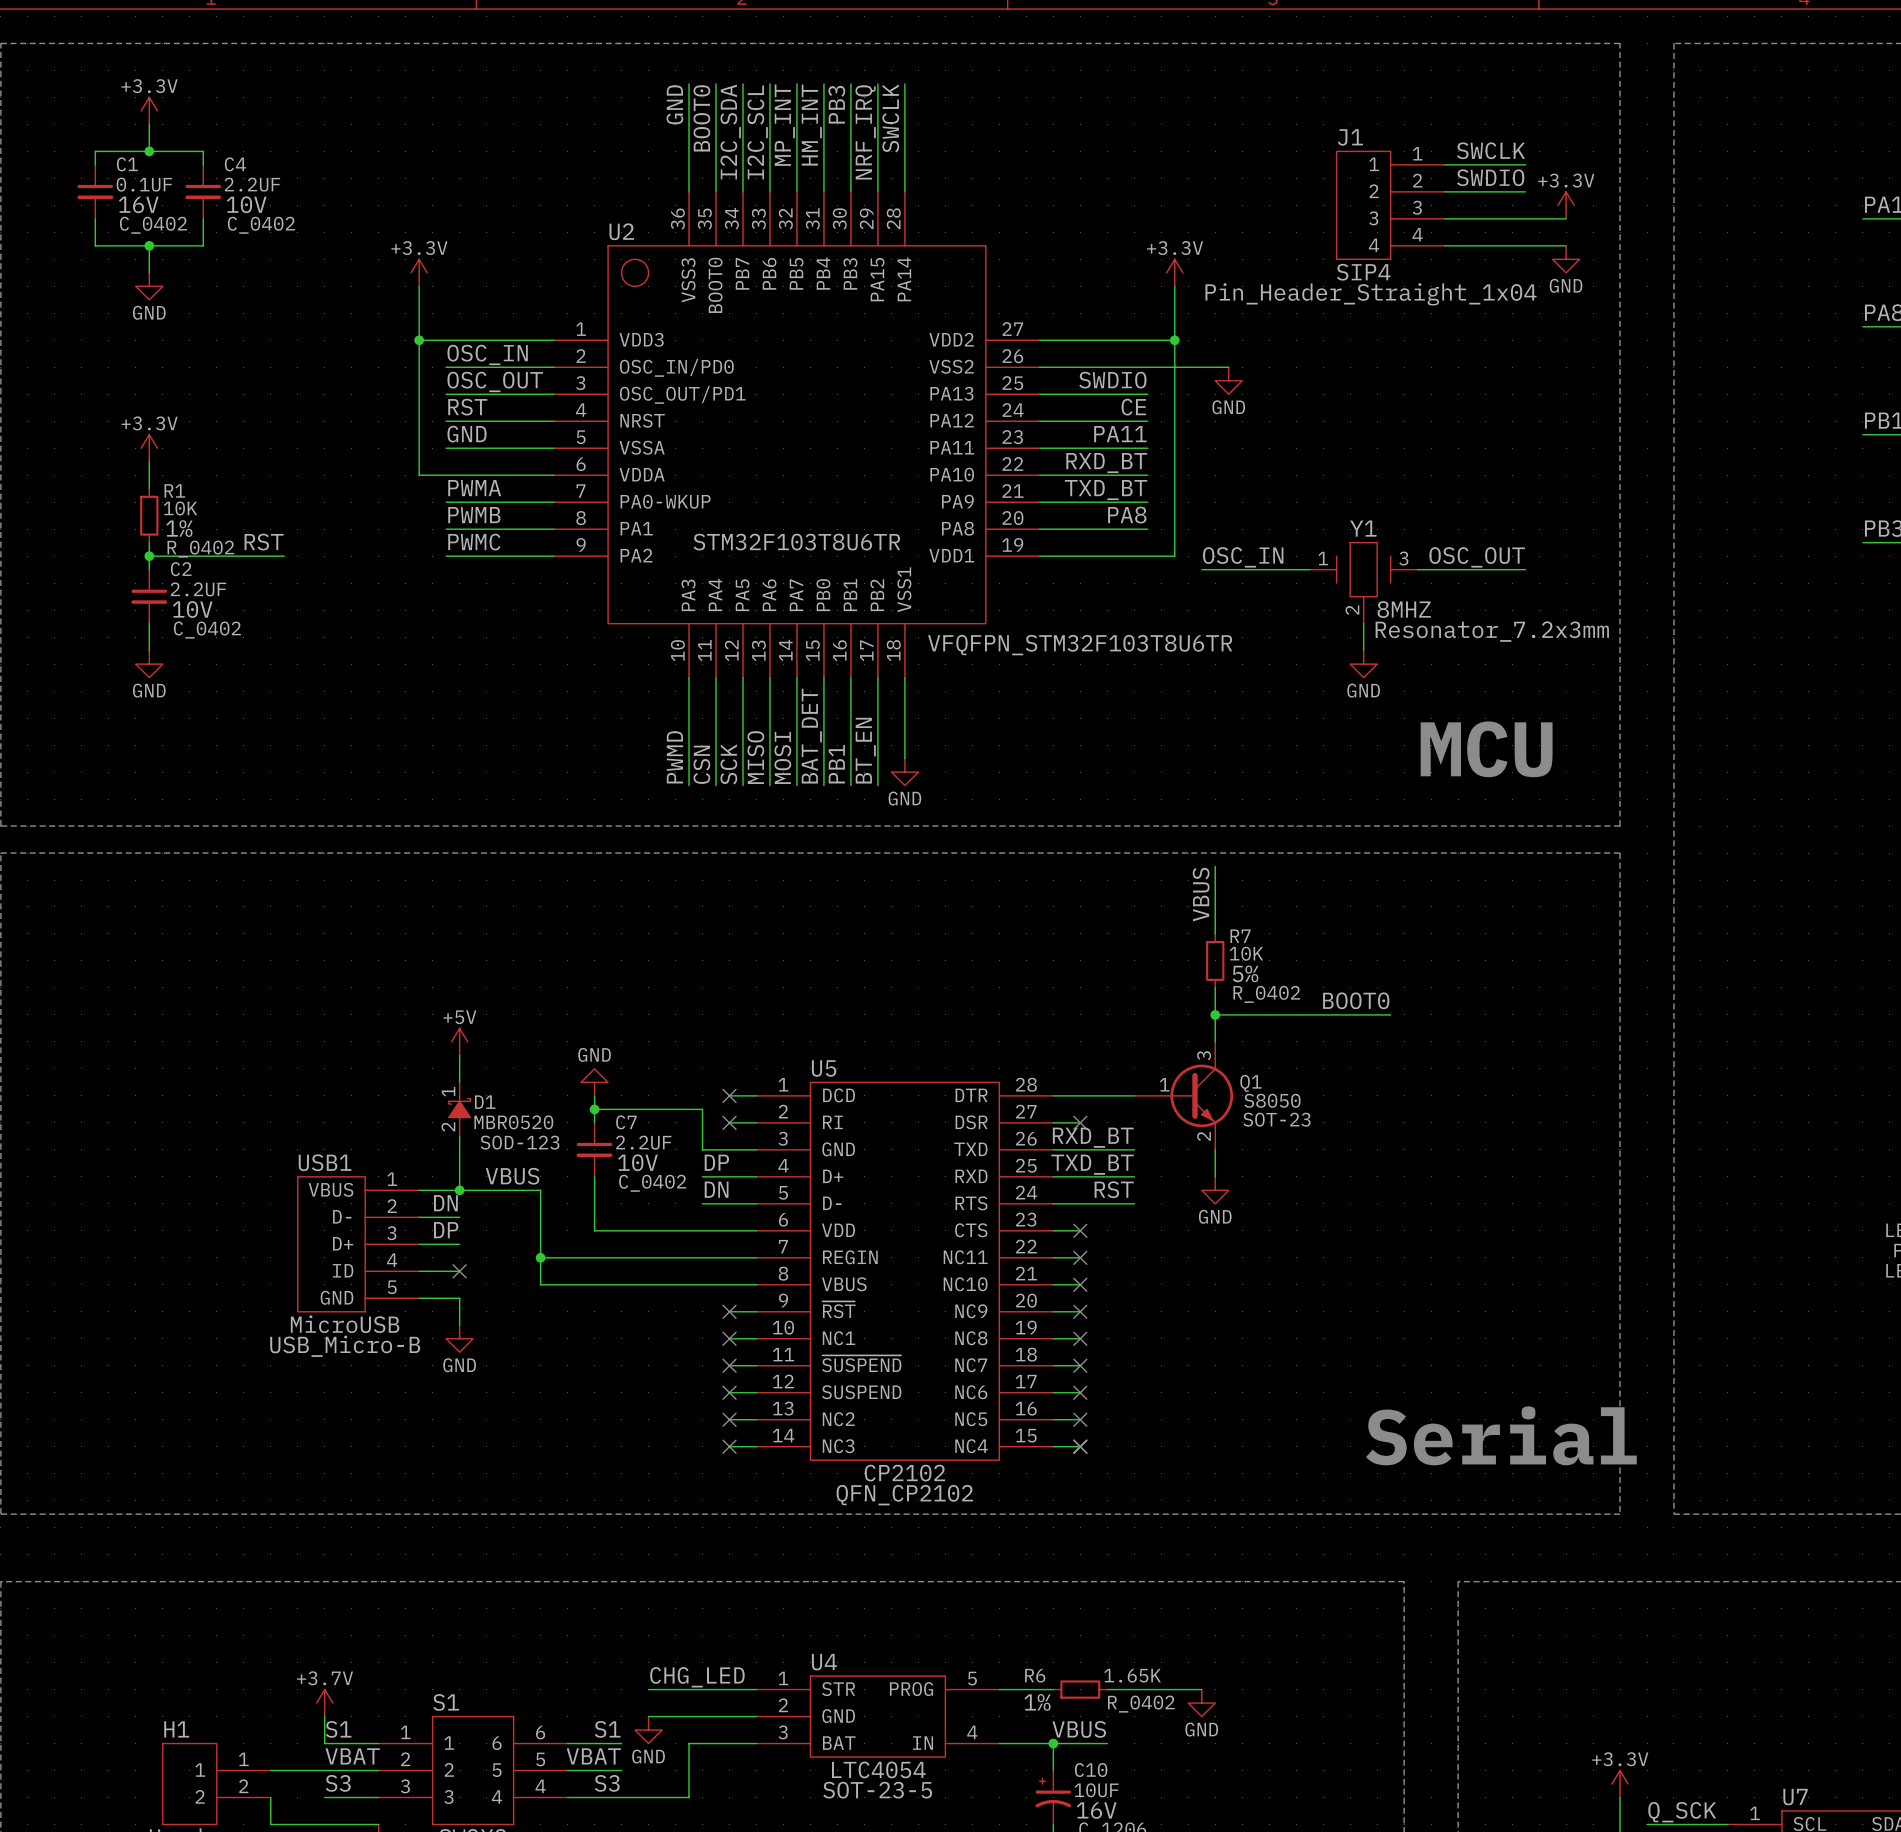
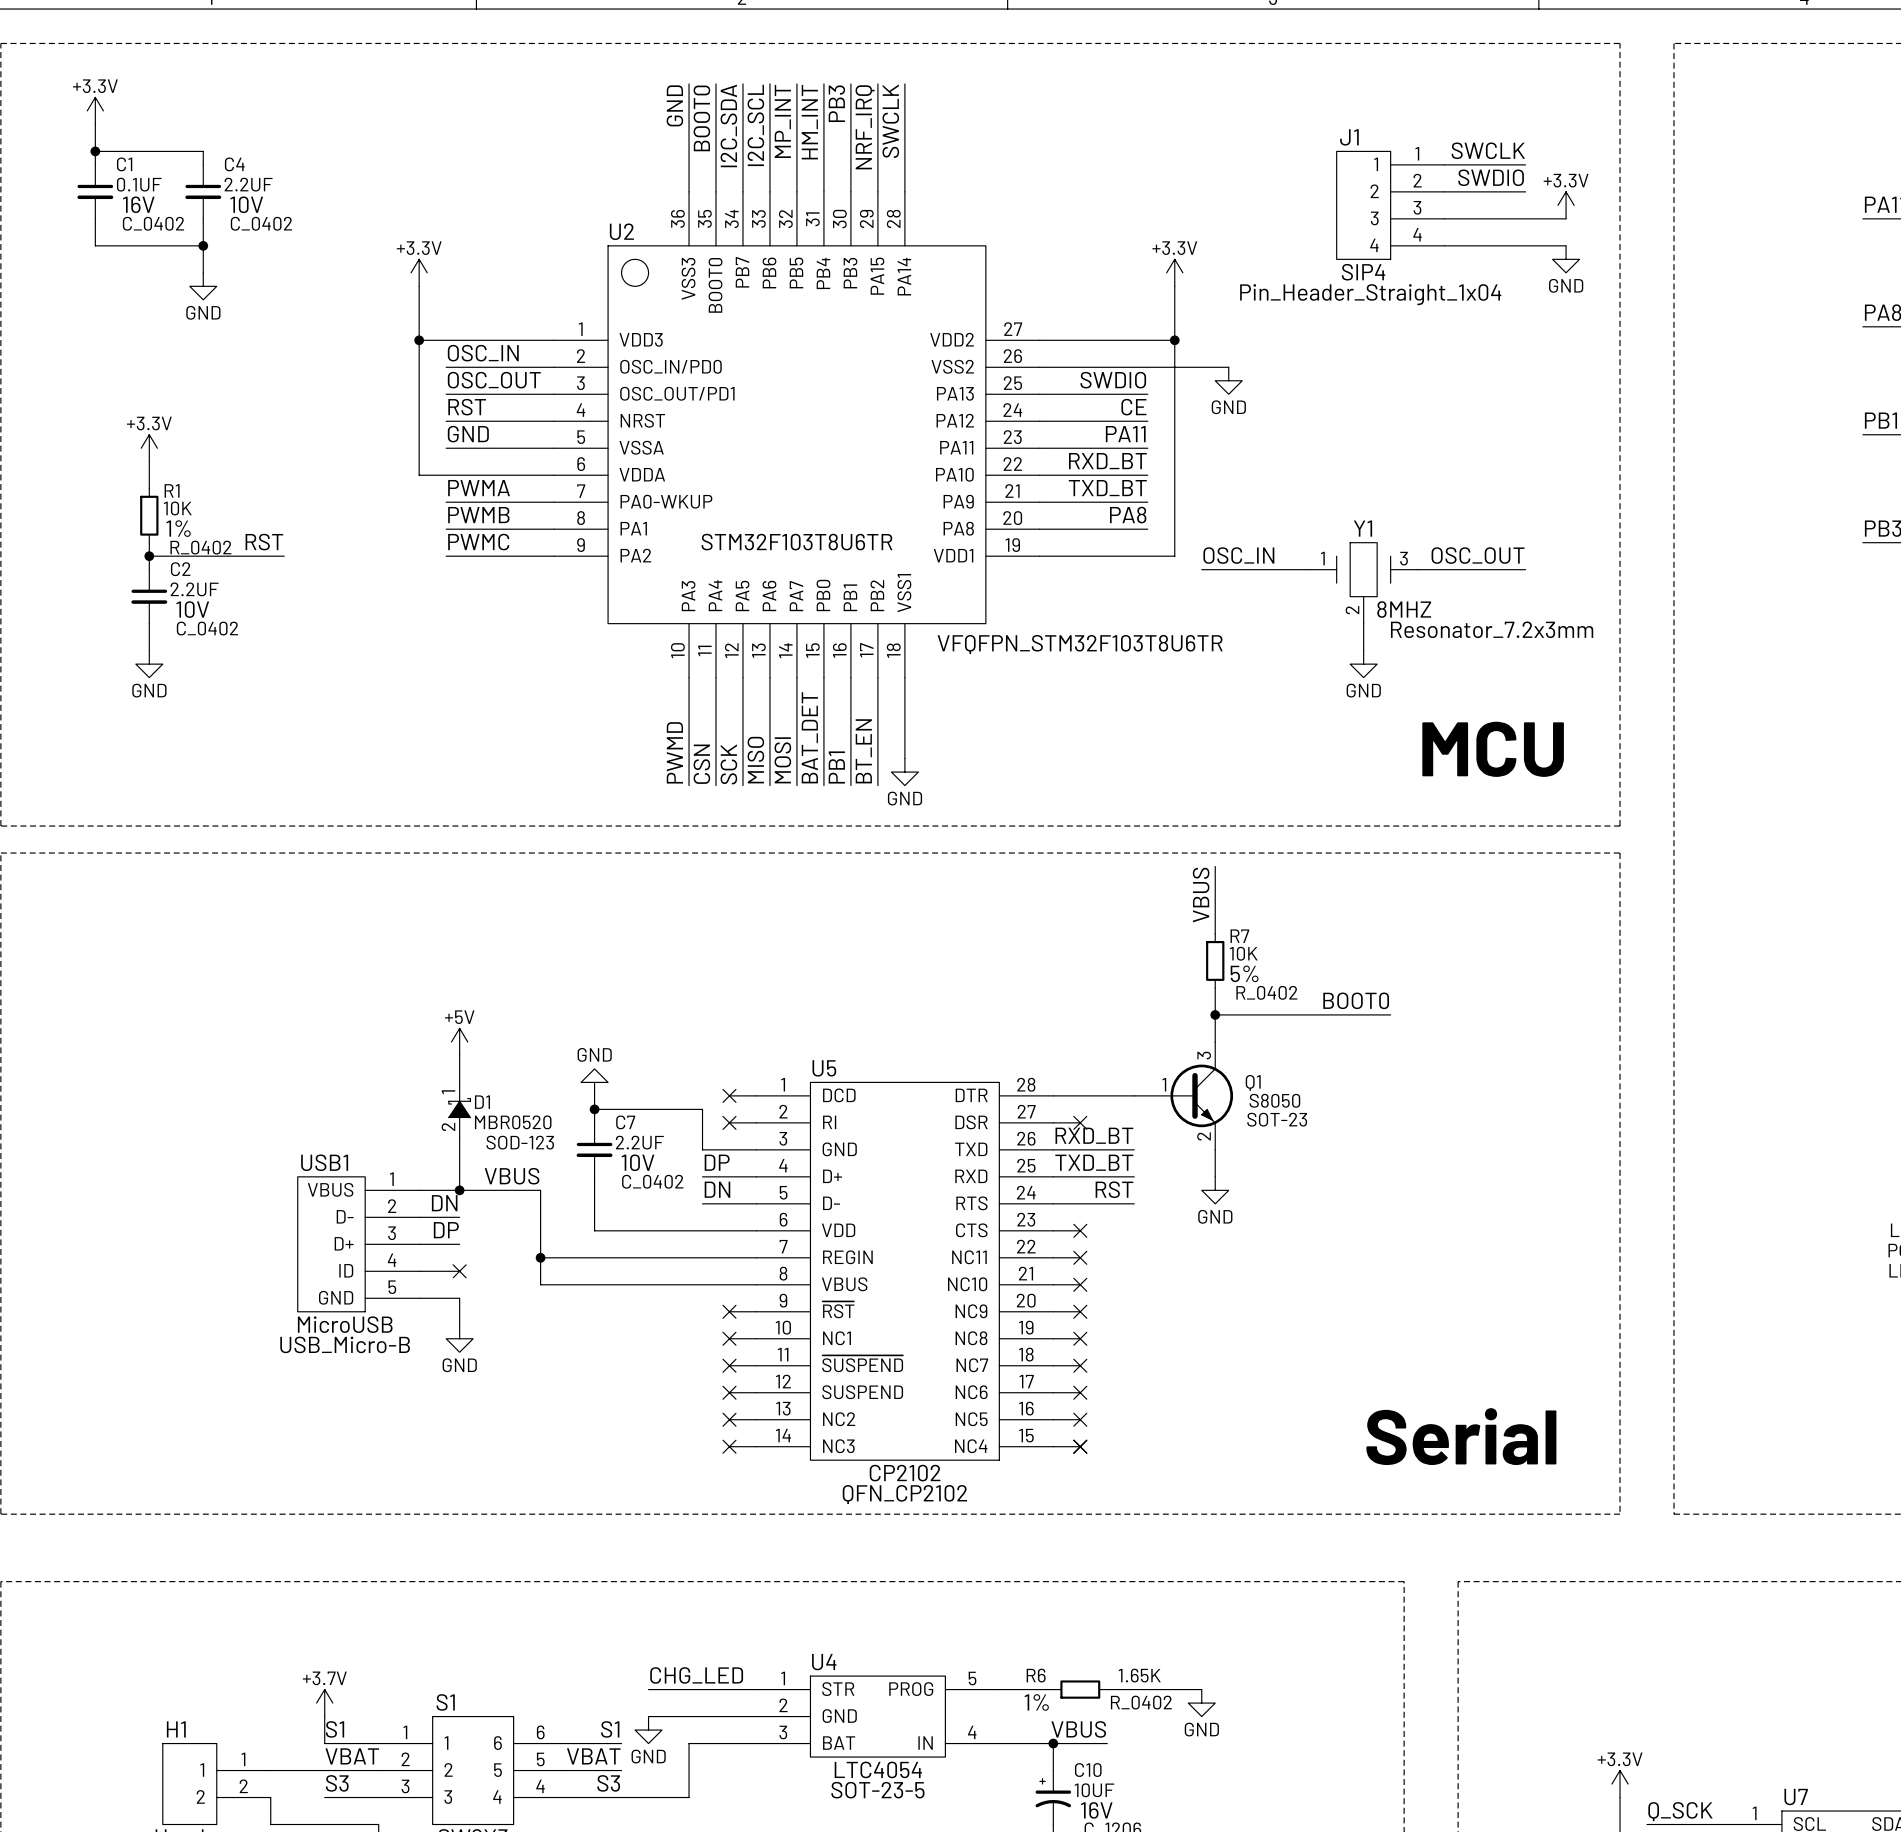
power symbol position: +3.3V (149, 110) -> +3.3V (95, 110)
wire: (149, 124) (149, 151) -> (95, 124) (95, 151)
junction position: (149, 151) -> (95, 151)
wire: (149, 245) (149, 272) -> (203, 245) (203, 272)
junction position: (149, 245) -> (203, 245)
power symbol position: GND (149, 286) -> GND (203, 286)

